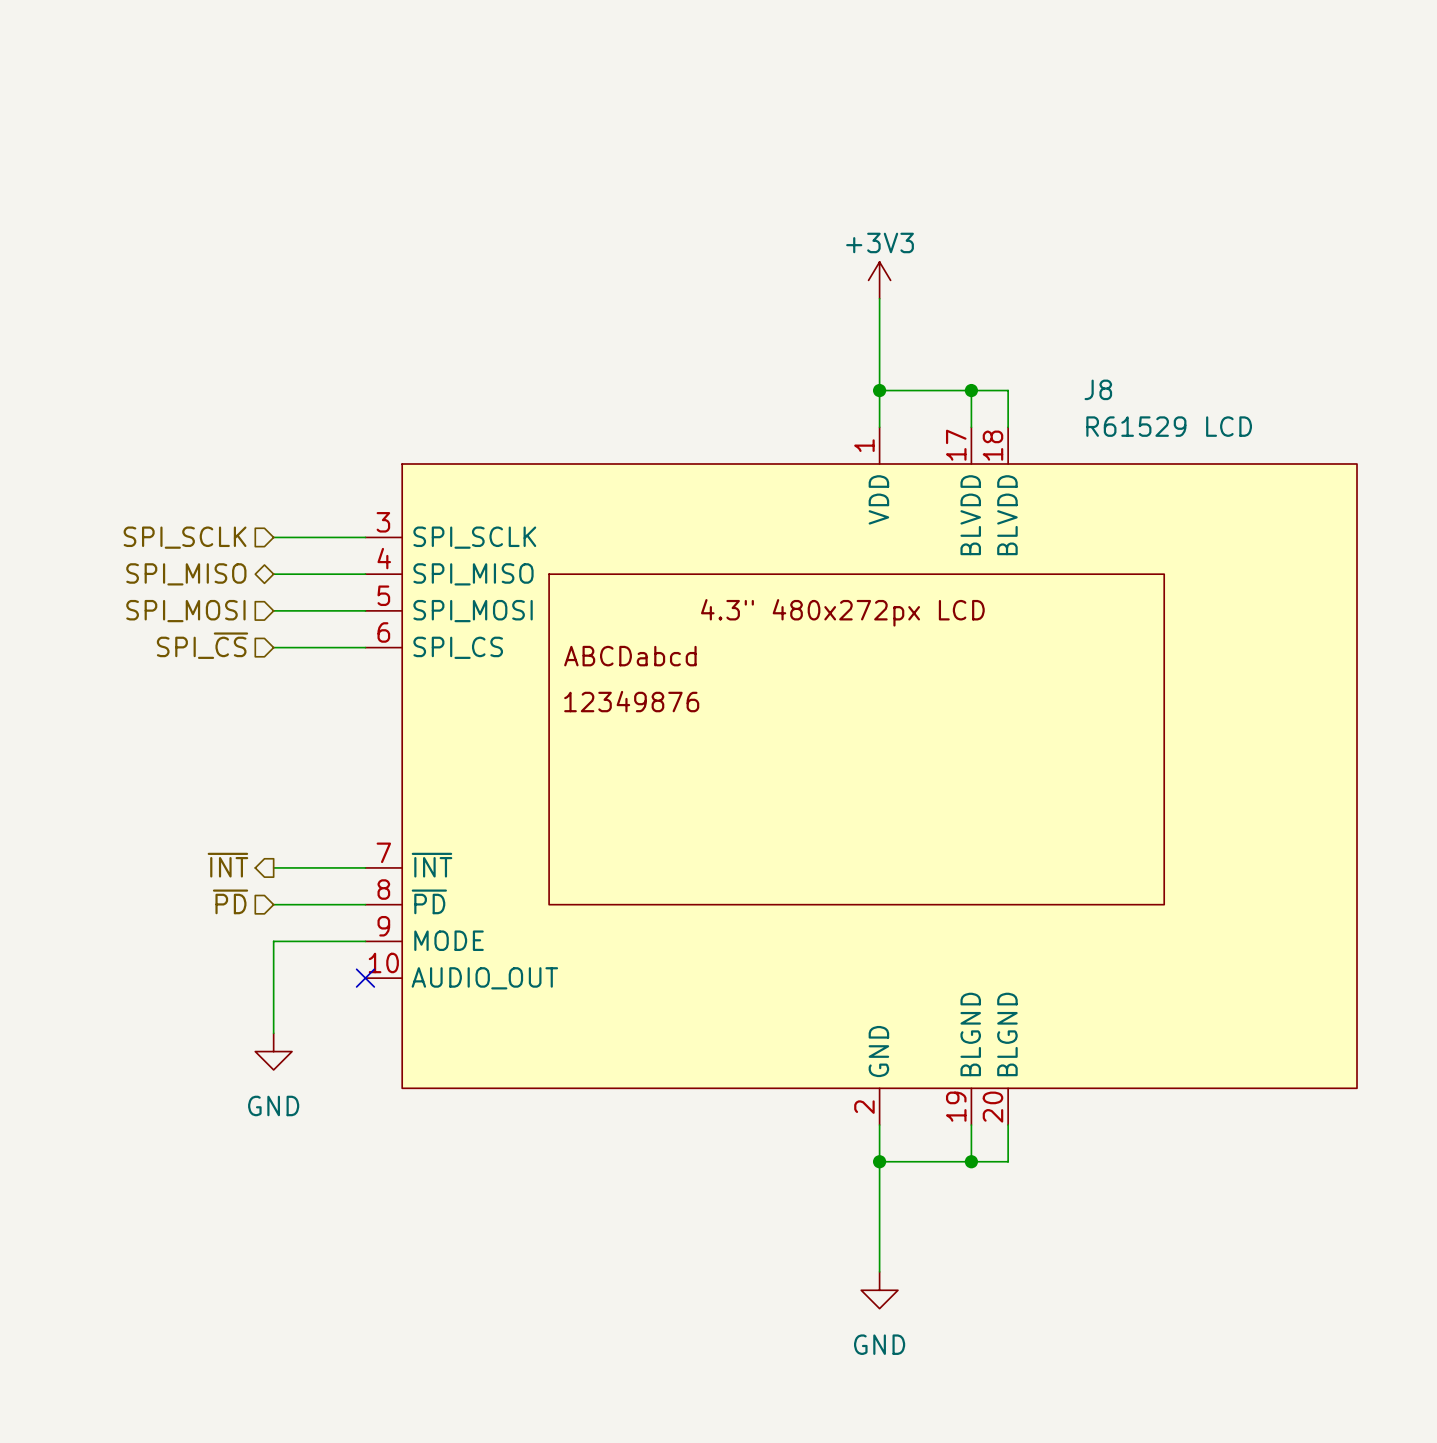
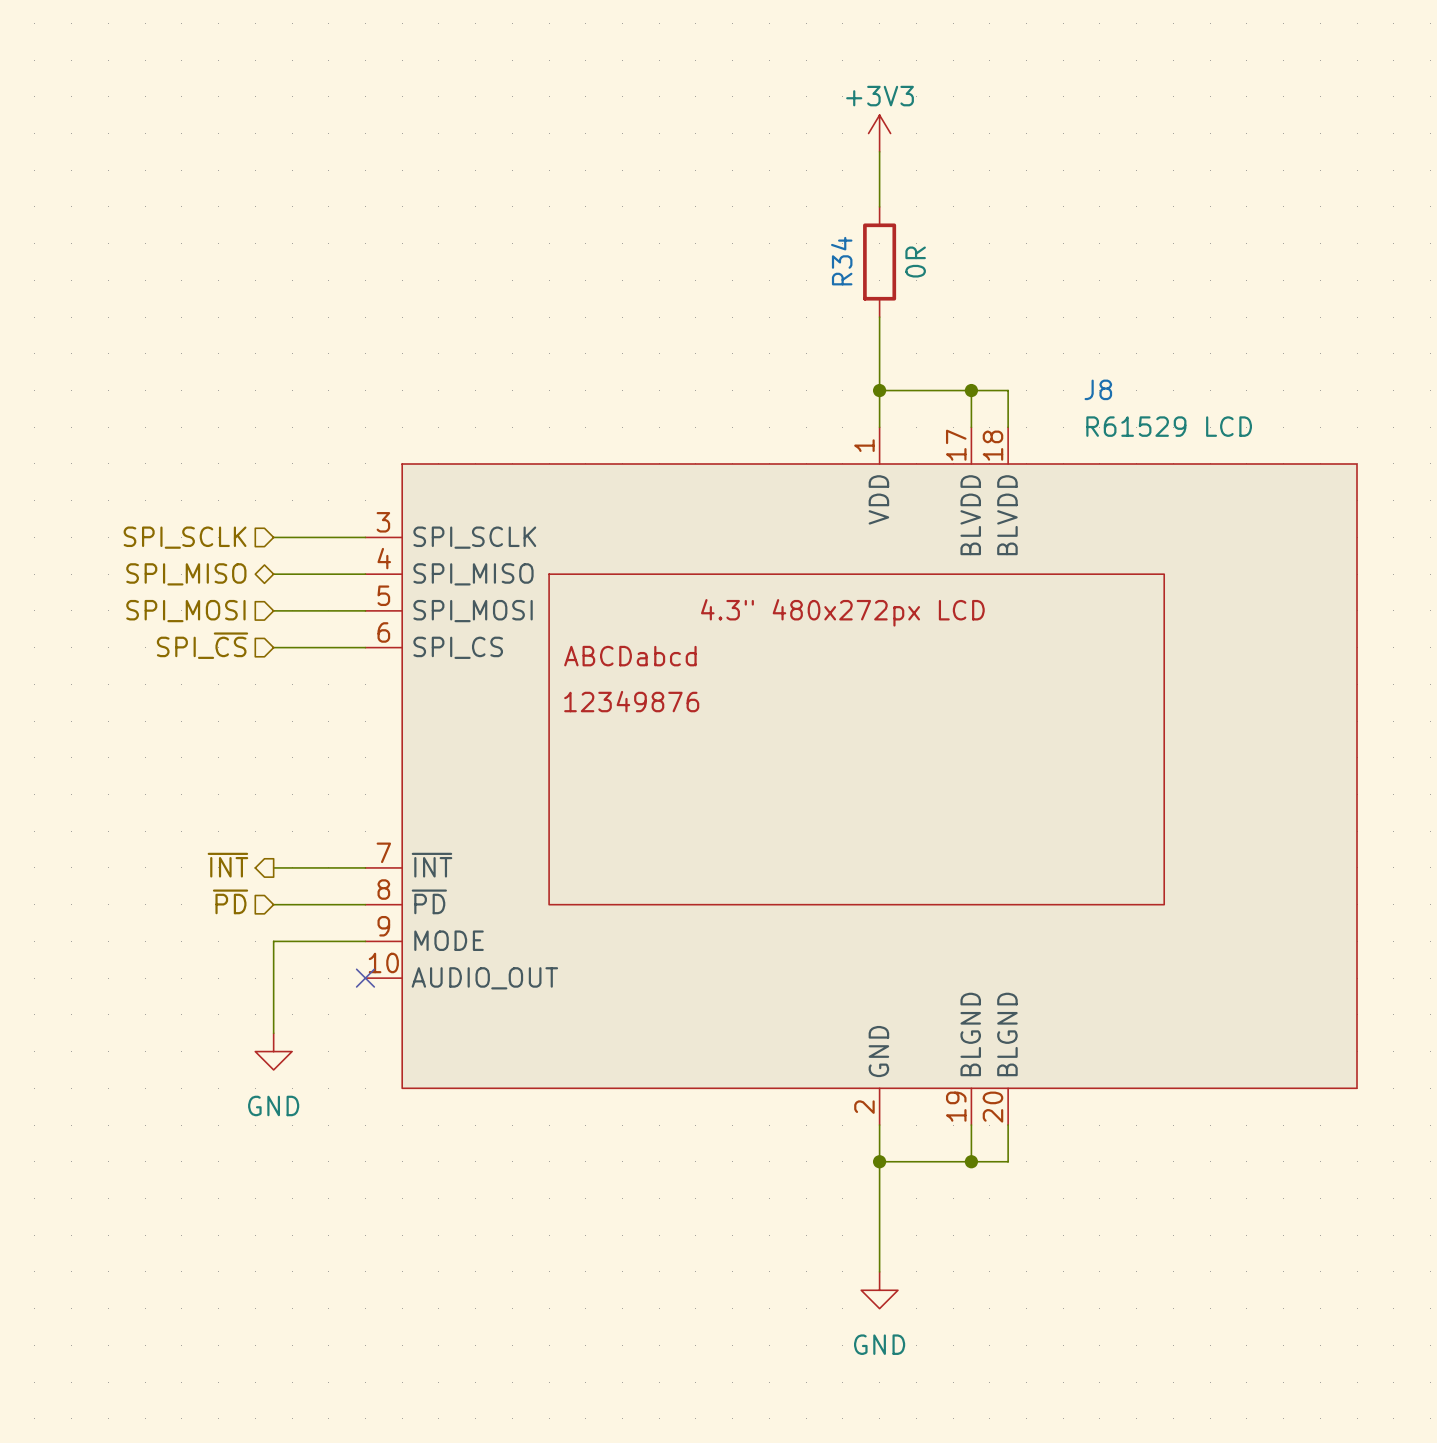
wire: none -> (879, 151) (879, 206)
R34: none -> 0R (879, 262)
power symbol position: +3V3 (879, 280) -> +3V3 (879, 133)

